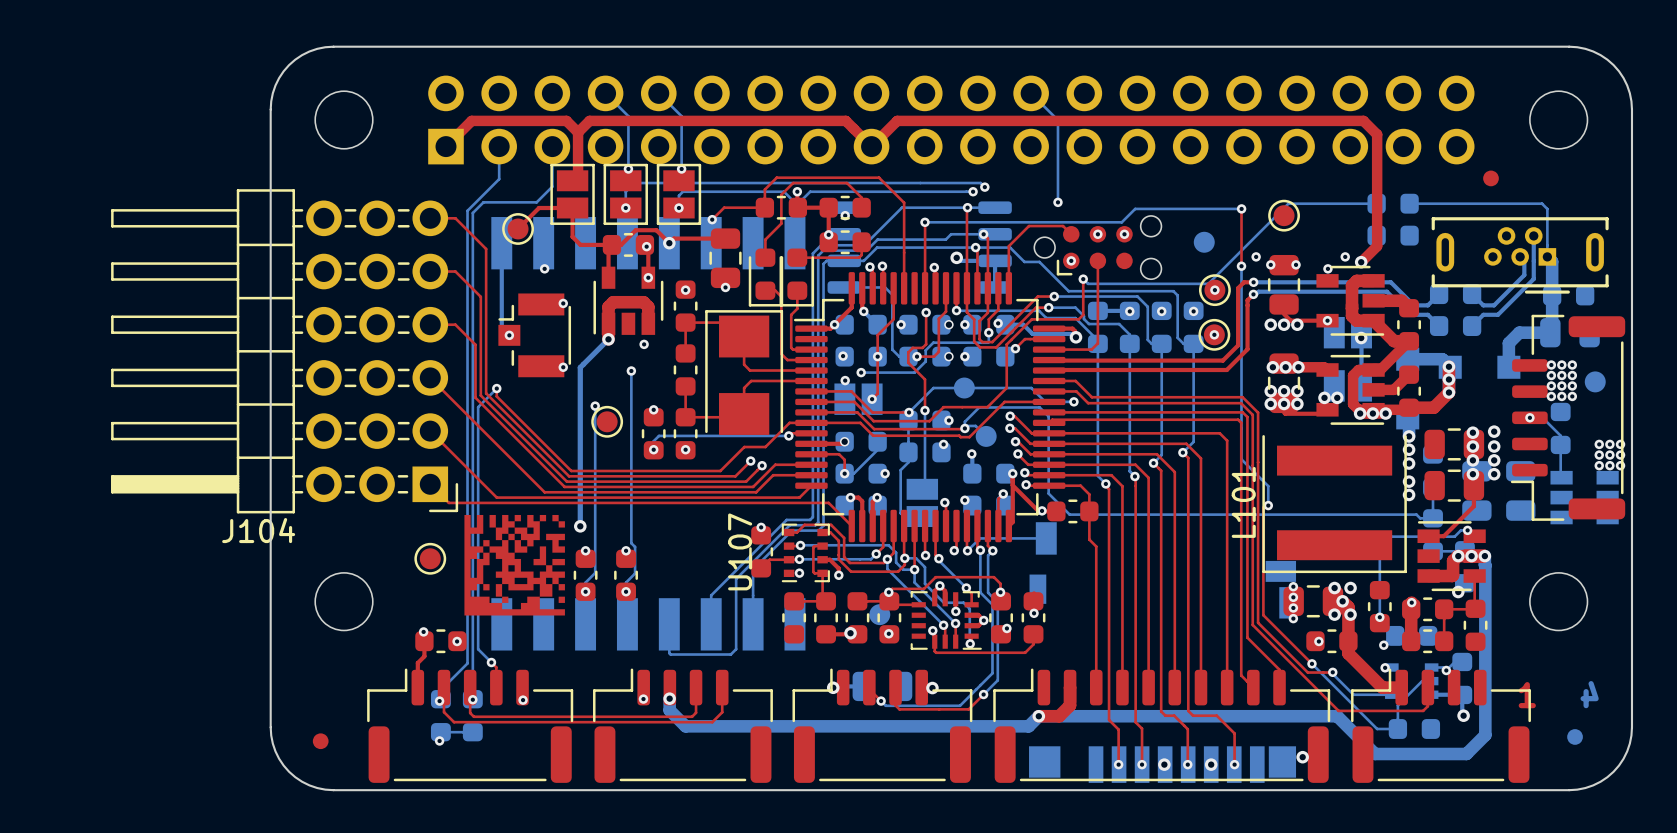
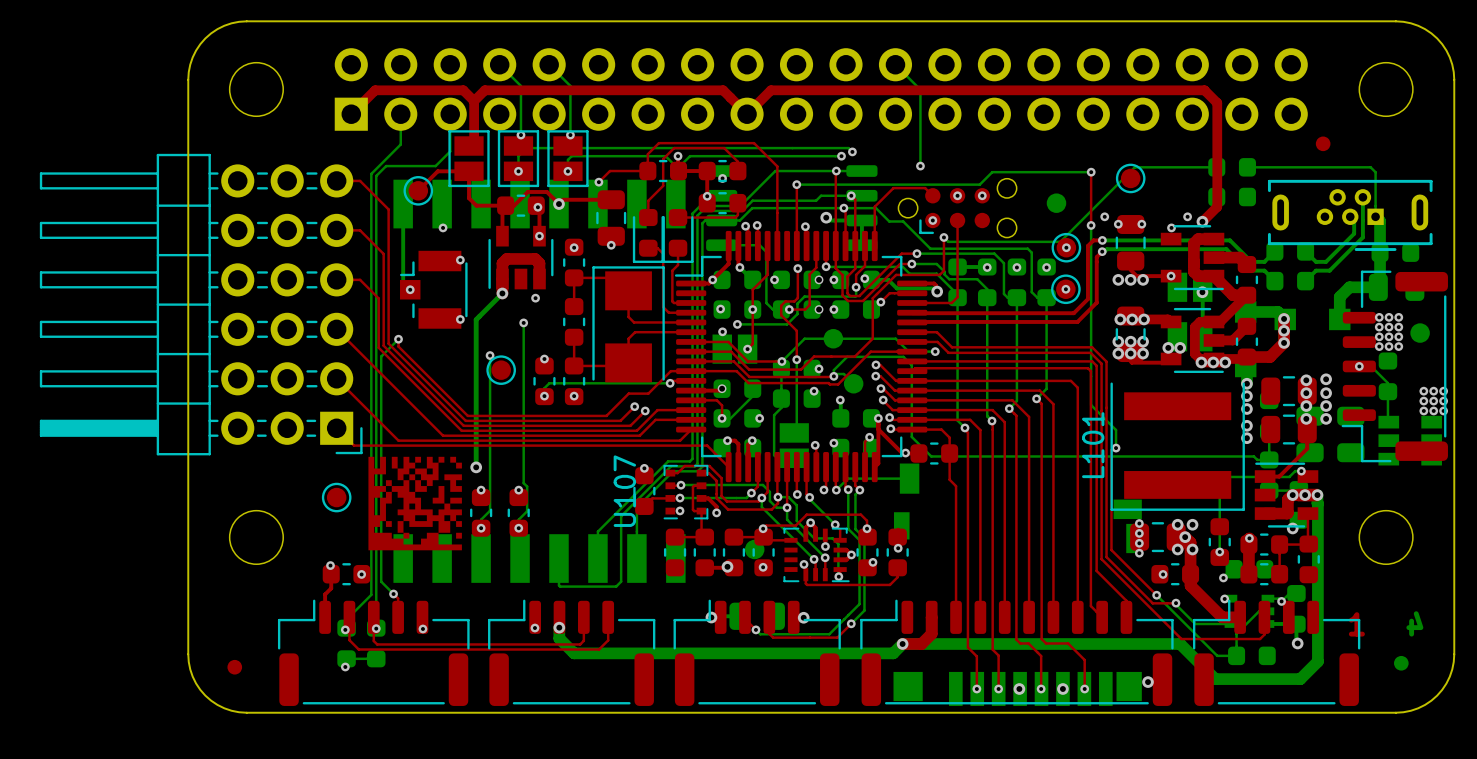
J104 name: J104 (258, 530) -> none

